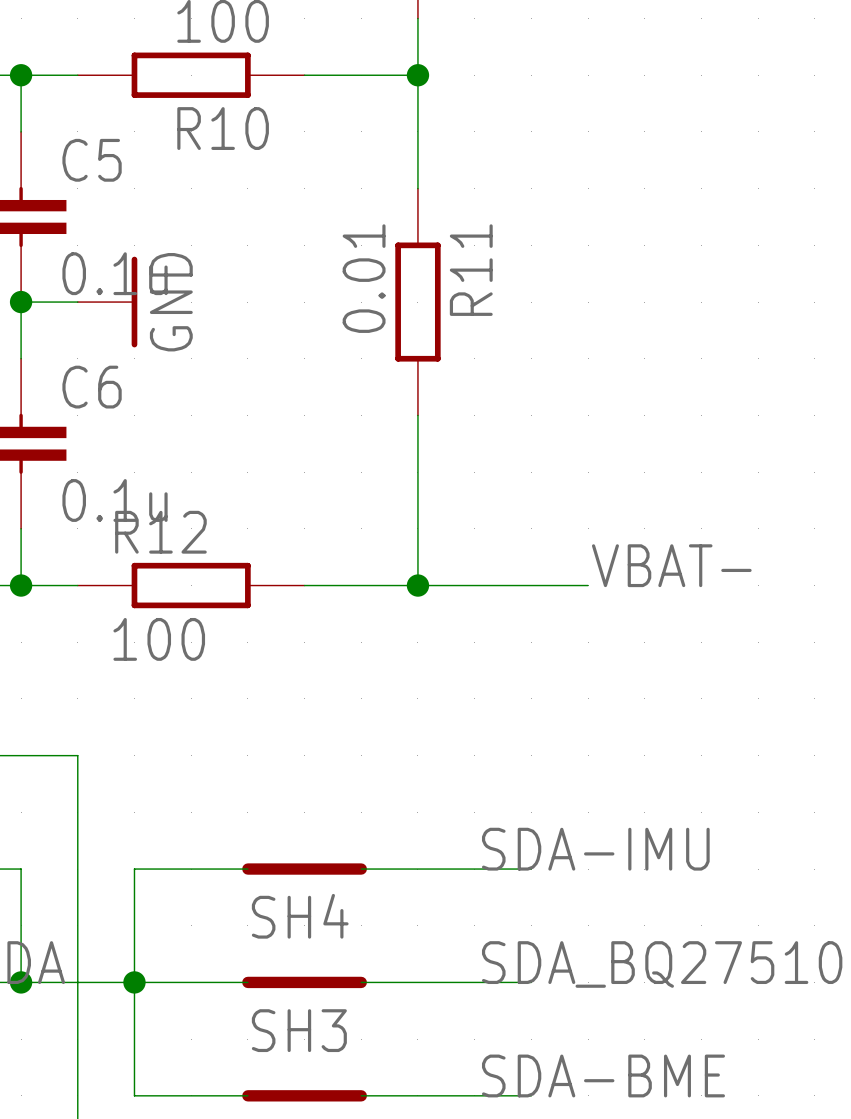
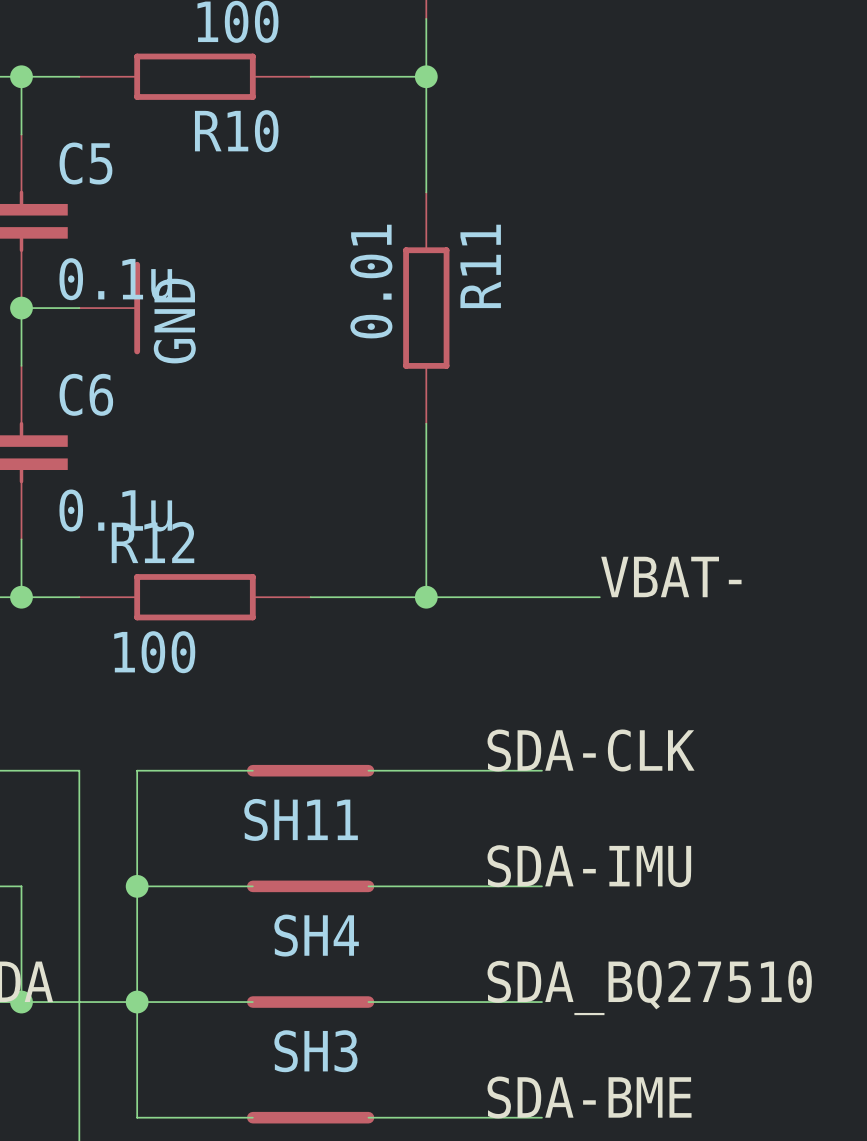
label: none -> SDA-CLK (591, 750)
wire: none -> (252, 770) (137, 770) (137, 886)
SH11: none -> (310, 770)
wire: none -> (368, 770) (541, 770)
junction: none -> (137, 886)

